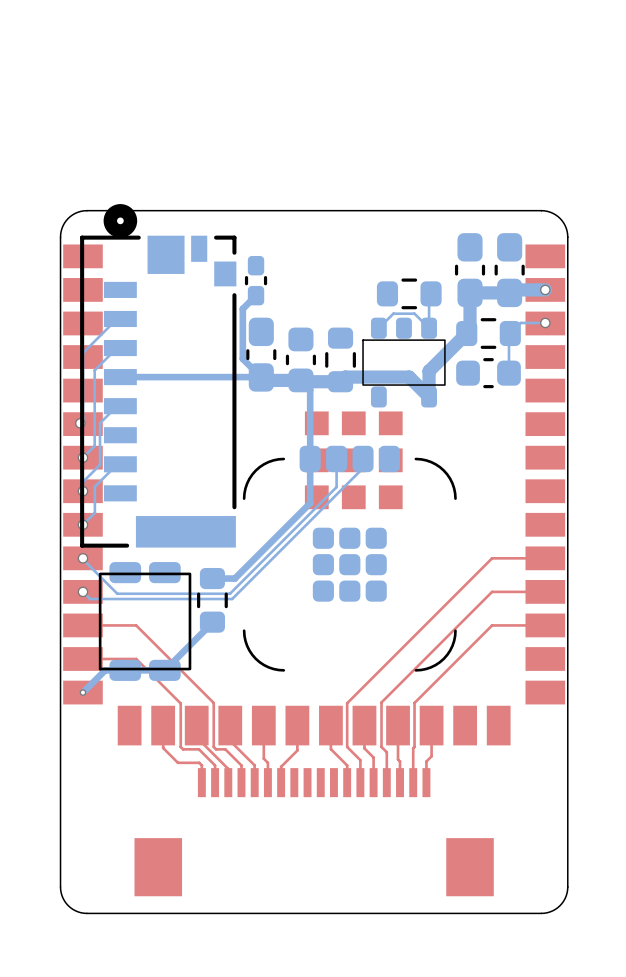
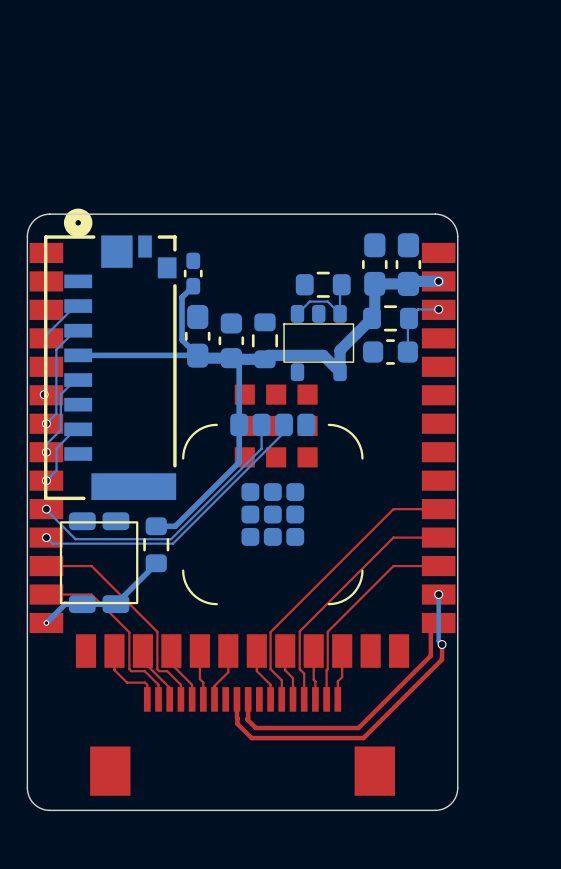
bottom track: none -> (438, 594) (438, 641) (442, 644)
via: none -> (438, 594)
top track: none -> (438, 623) (430, 630) (430, 655) (358, 728) (255, 728) (247, 719) (248, 699)
top track: none -> (442, 644) (442, 659) (363, 738) (251, 738) (237, 723) (236, 699)
via: none -> (442, 644)

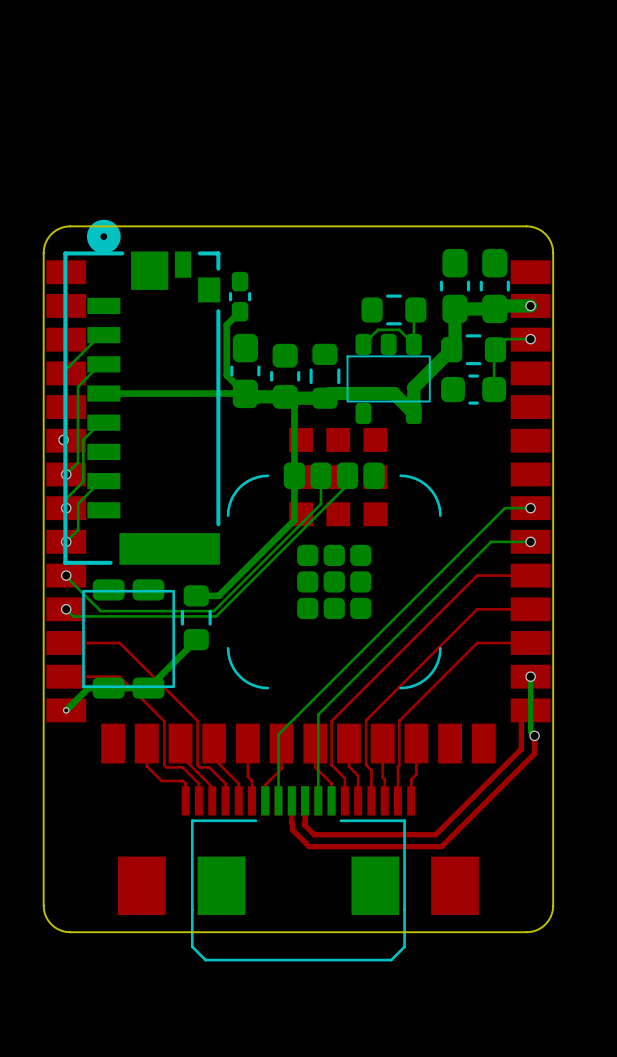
bottom track: none -> (530, 508) (504, 508) (278, 734) (278, 800)
via: none -> (530, 508)
bottom track: none -> (530, 541) (491, 541) (318, 714) (318, 800)
via: none -> (530, 541)
part: none -> (298, 873)

